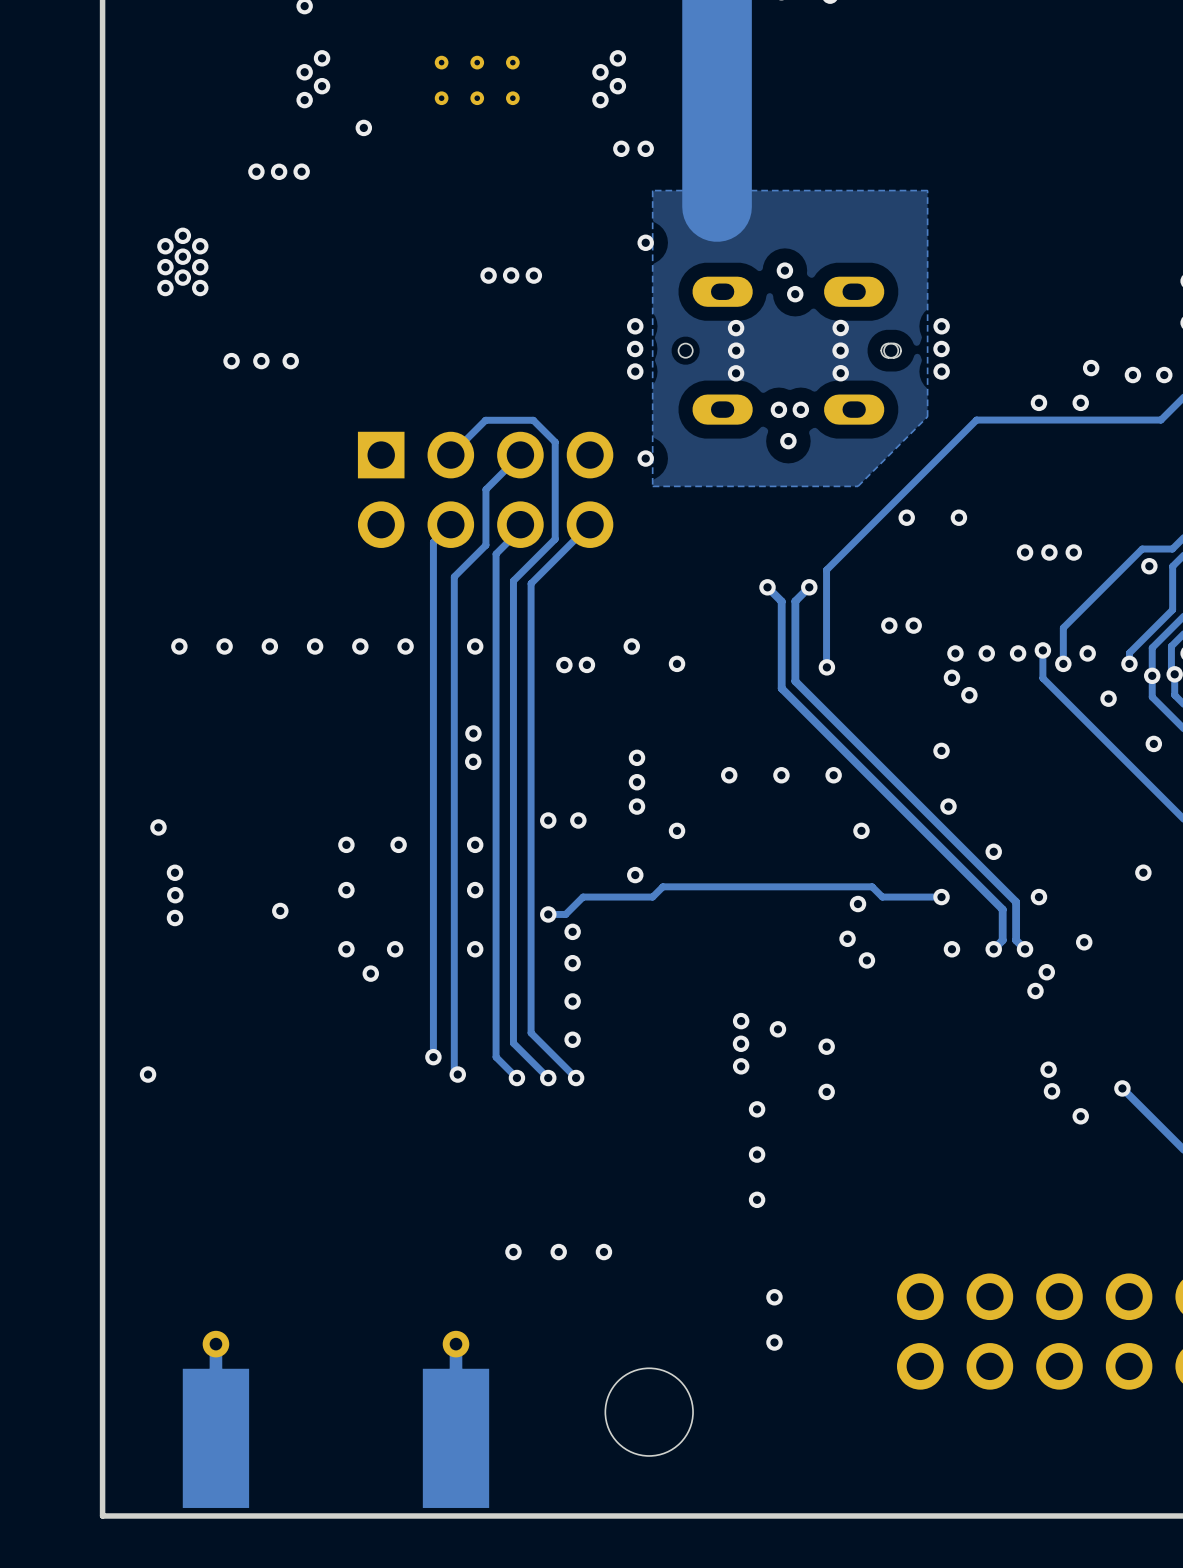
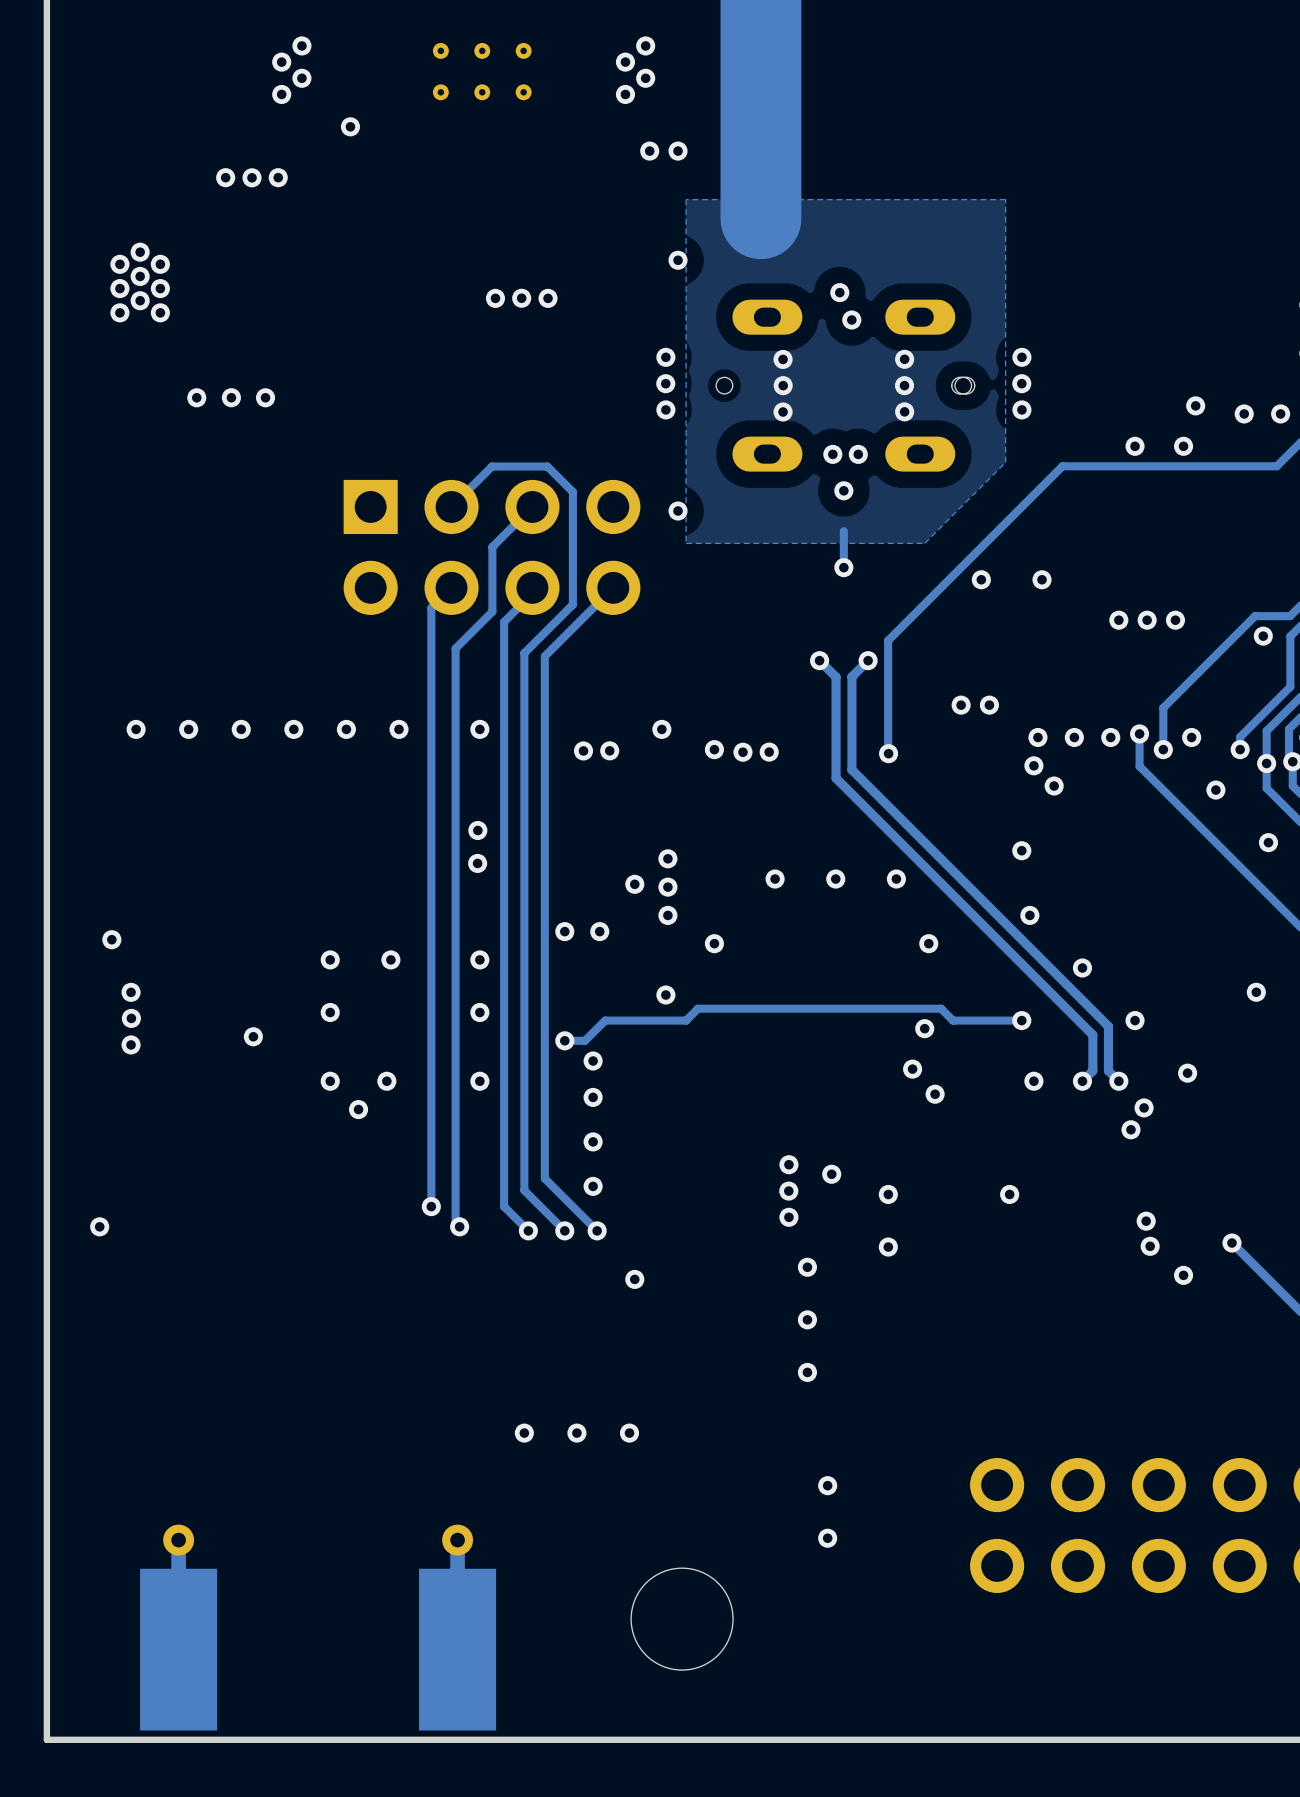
track: none -> (843, 531) (843, 567)
via: none -> (843, 567)
via: none -> (742, 752)
via: none -> (769, 752)
via: none -> (634, 884)
via: none -> (1009, 1194)
via: none -> (634, 1279)

